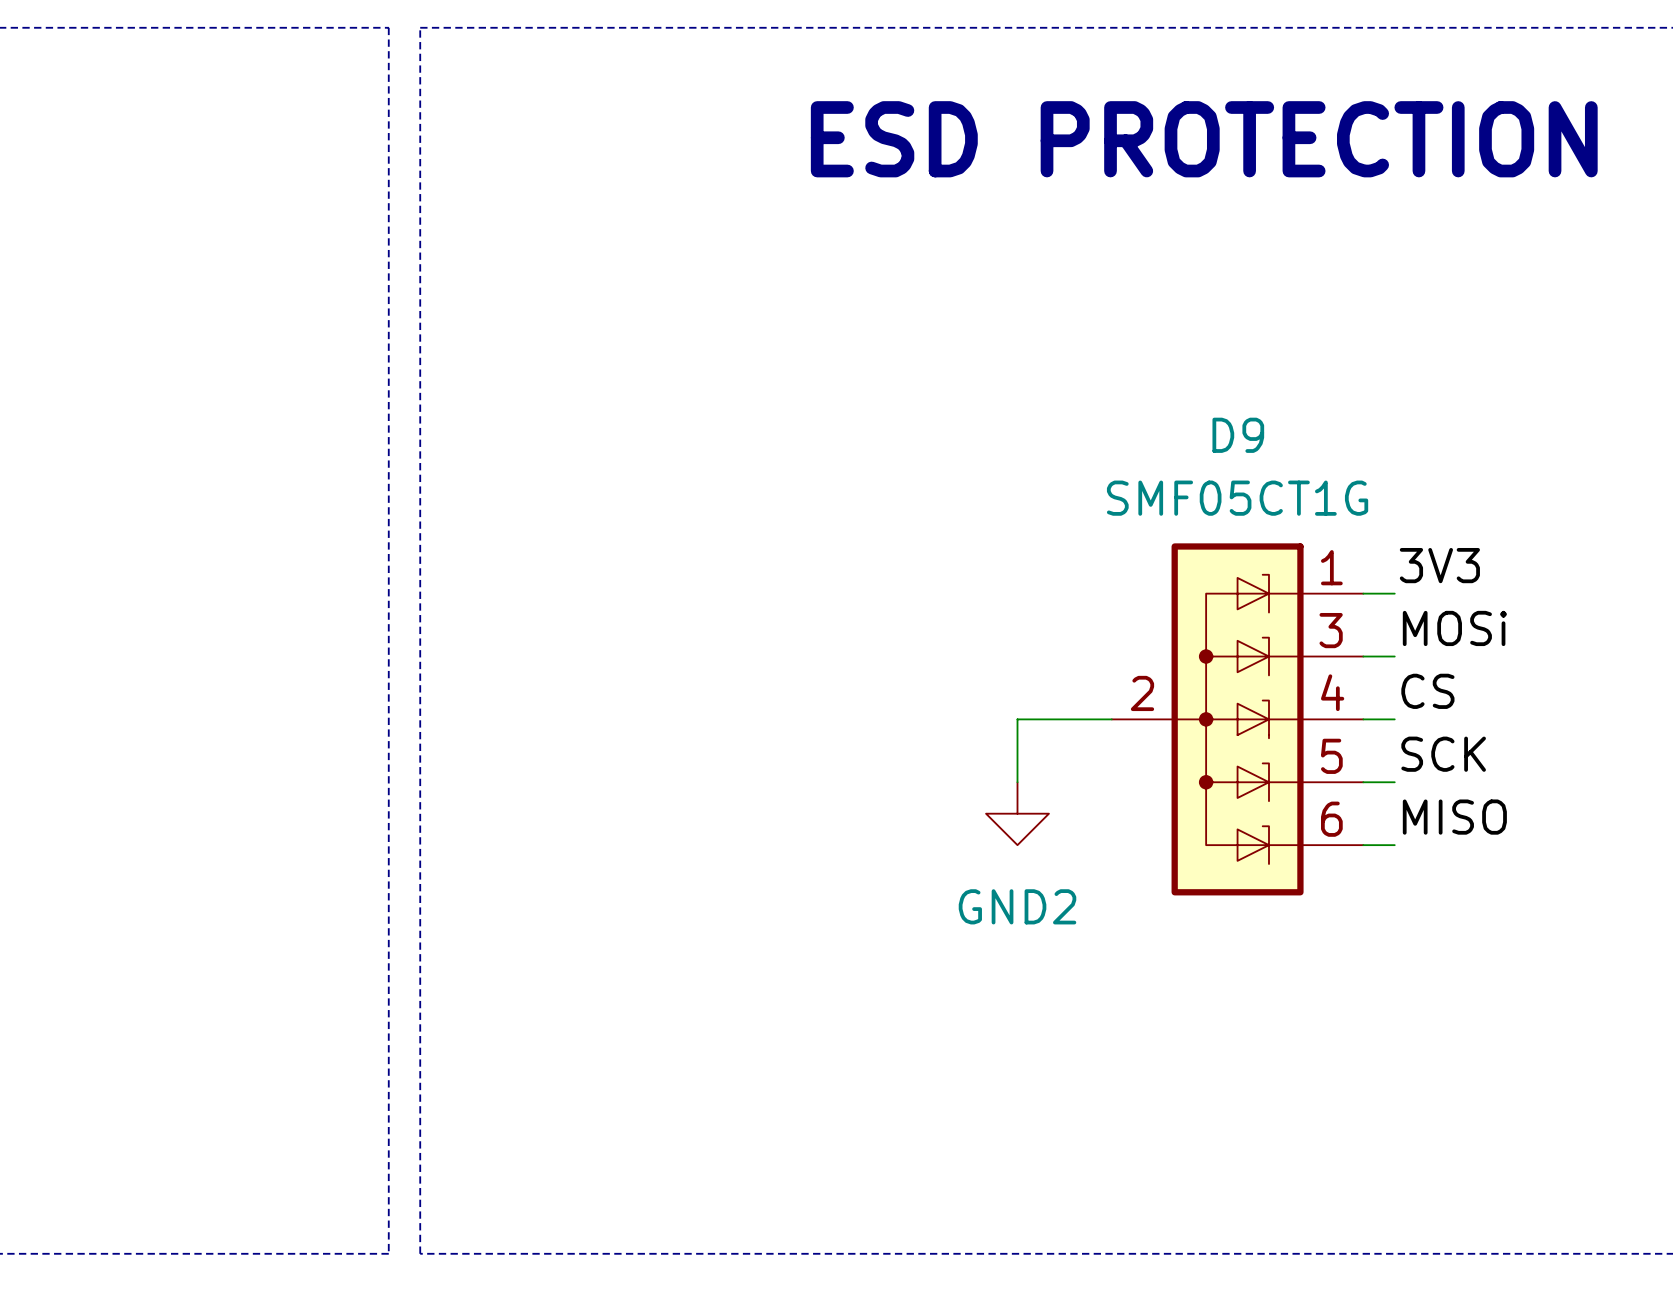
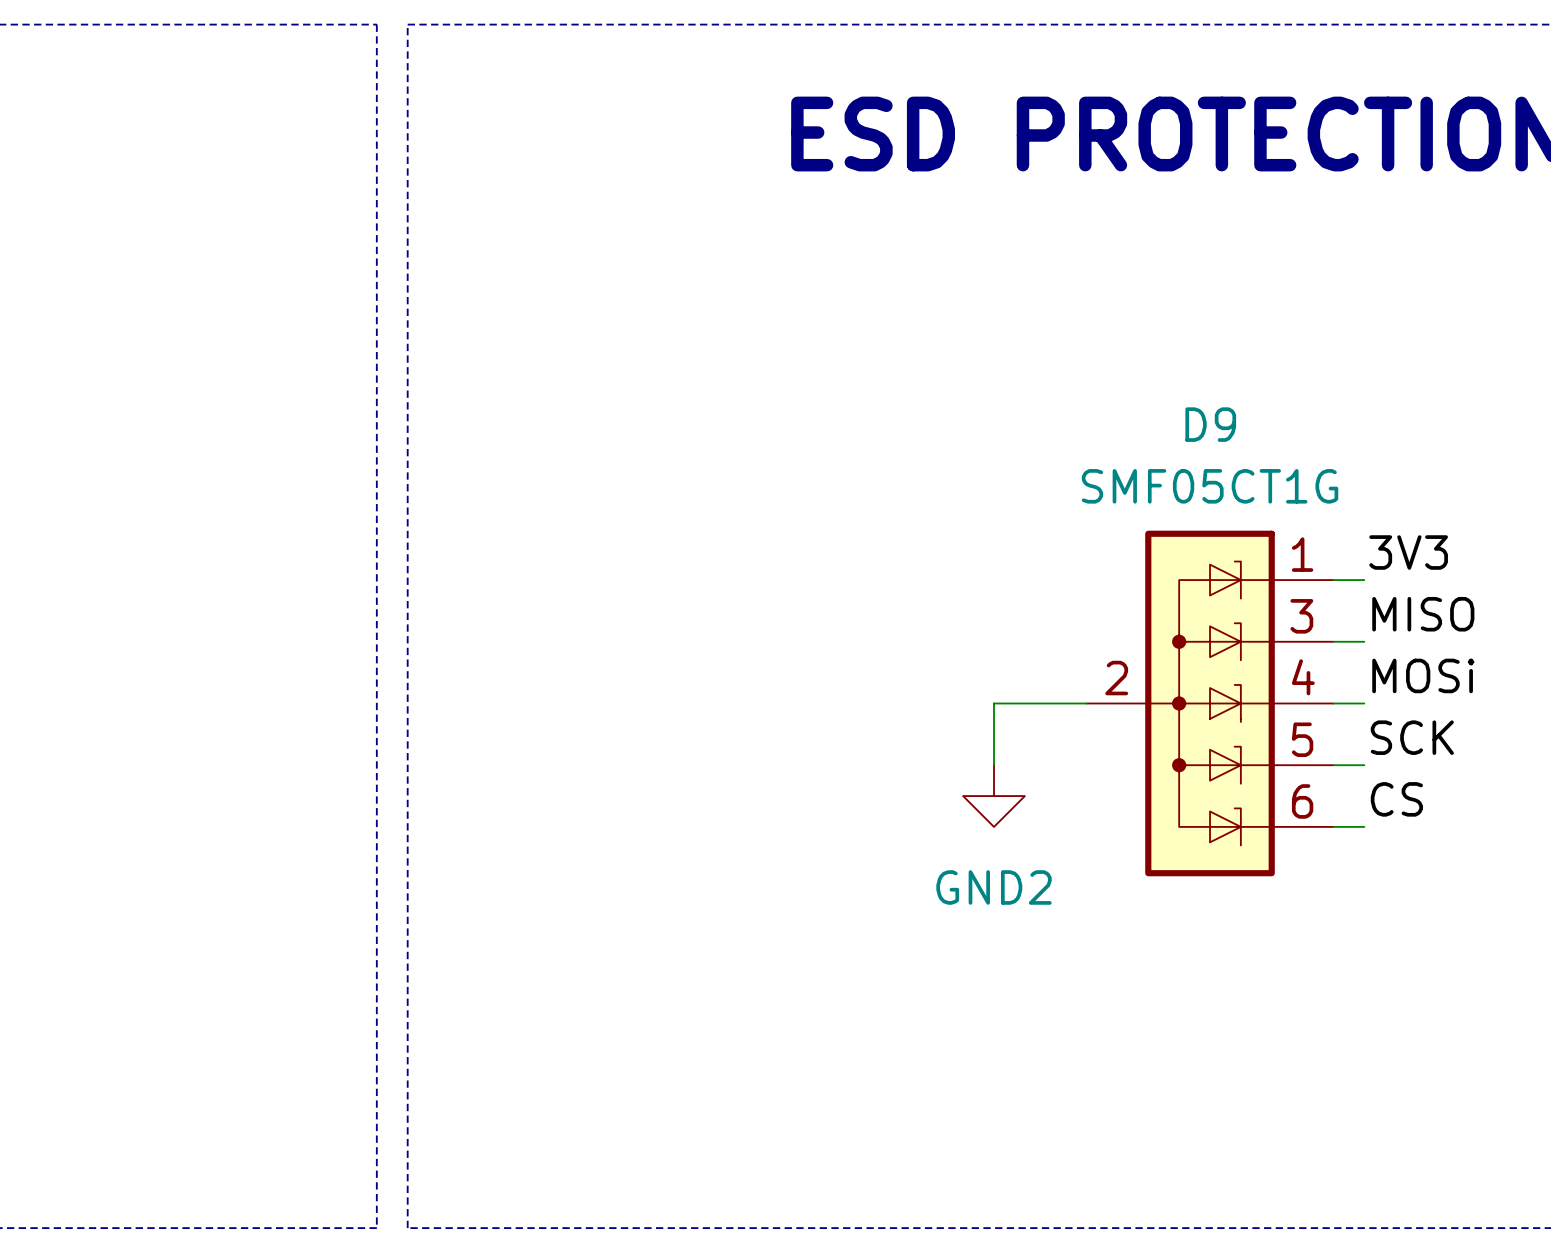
label: MOSi (1454, 628) -> MISO (1423, 614)
label: CS (1427, 691) -> MOSi (1423, 675)
label: MISO (1454, 817) -> CS (1396, 799)

